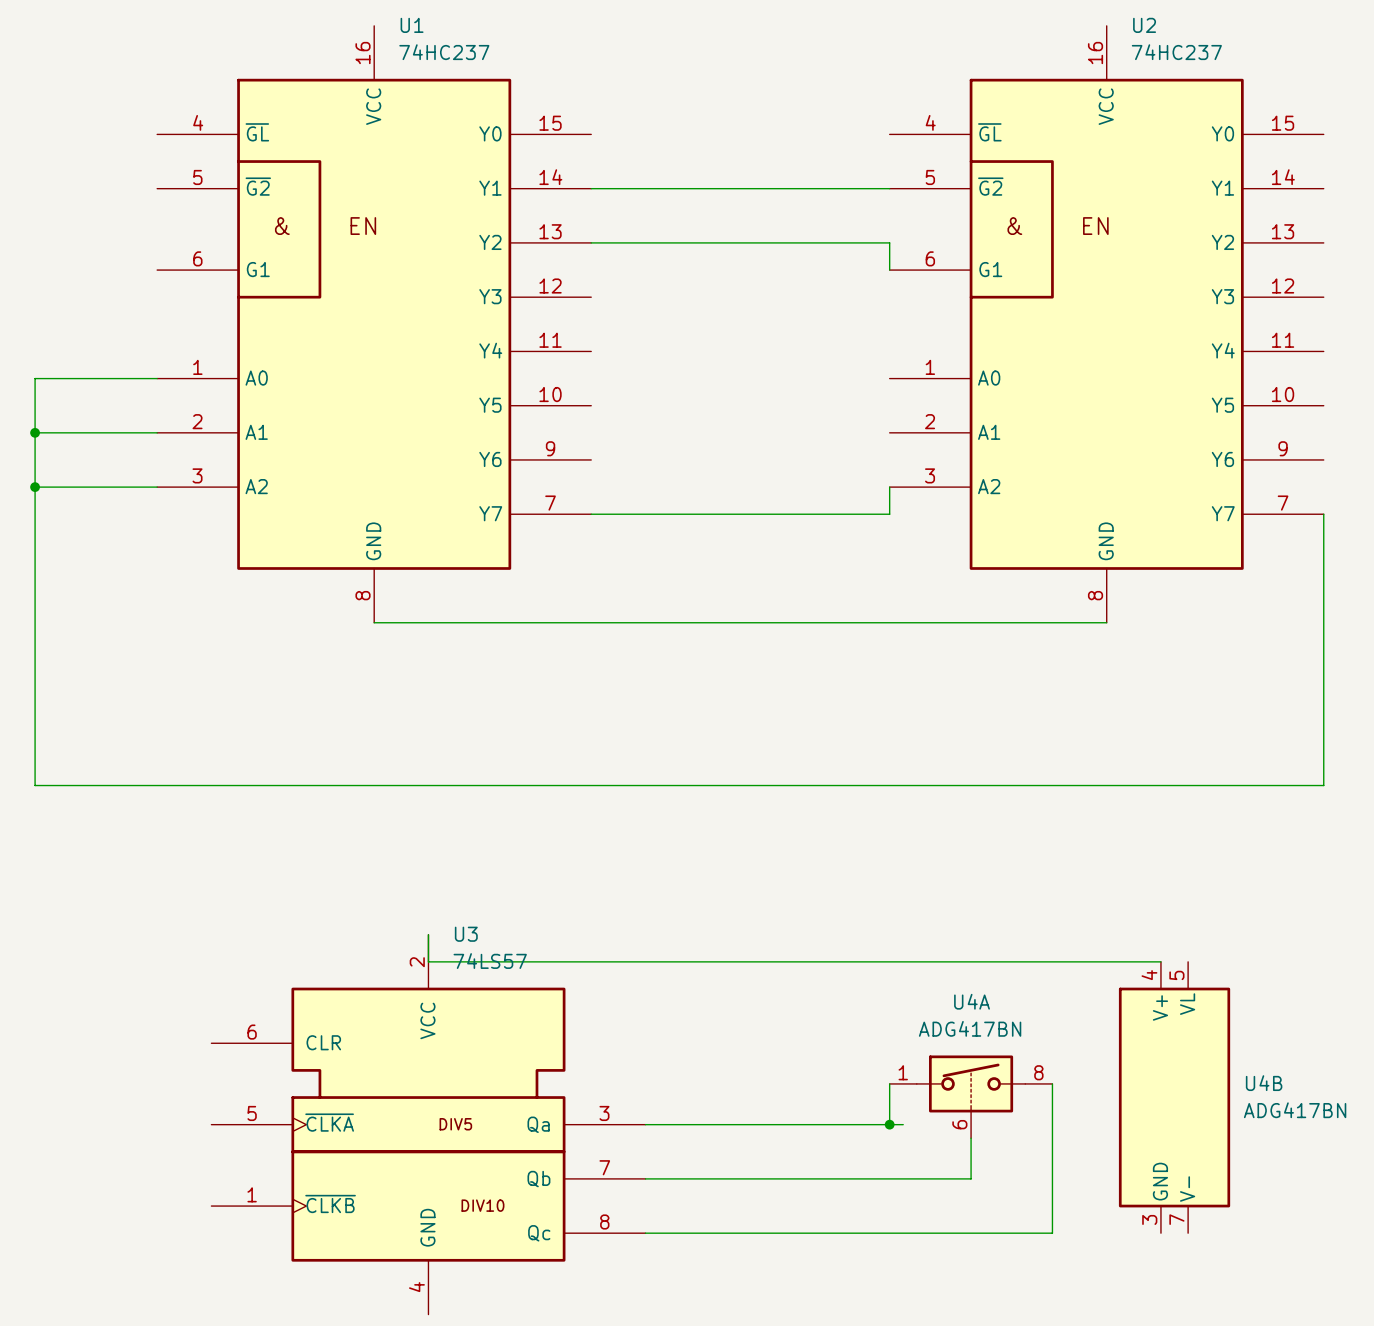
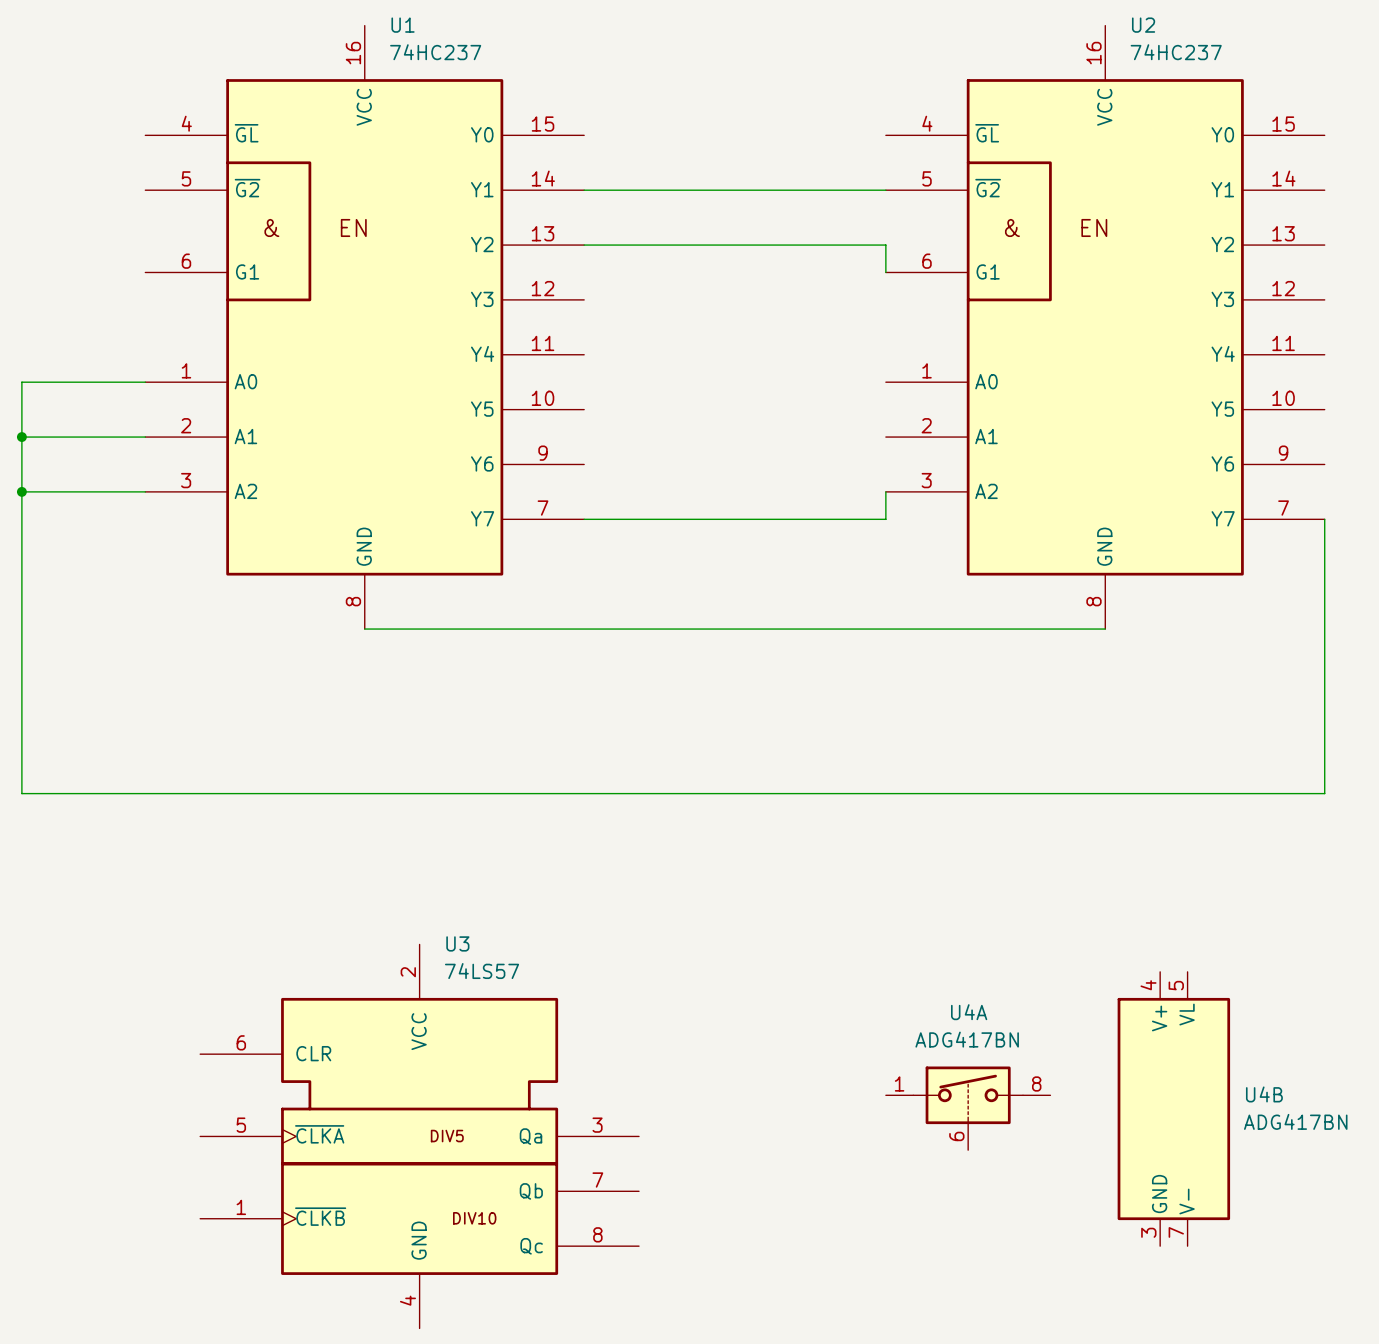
wire: (428, 934) (428, 961) (1160, 961) -> none
wire: (889, 1083) (889, 1124) -> none
wire: (1052, 1083) (1052, 1233) (645, 1233) -> none
wire: (645, 1124) (903, 1124) -> none
junction: (889, 1124) -> none
wire: (971, 1138) (971, 1178) (645, 1178) -> none

